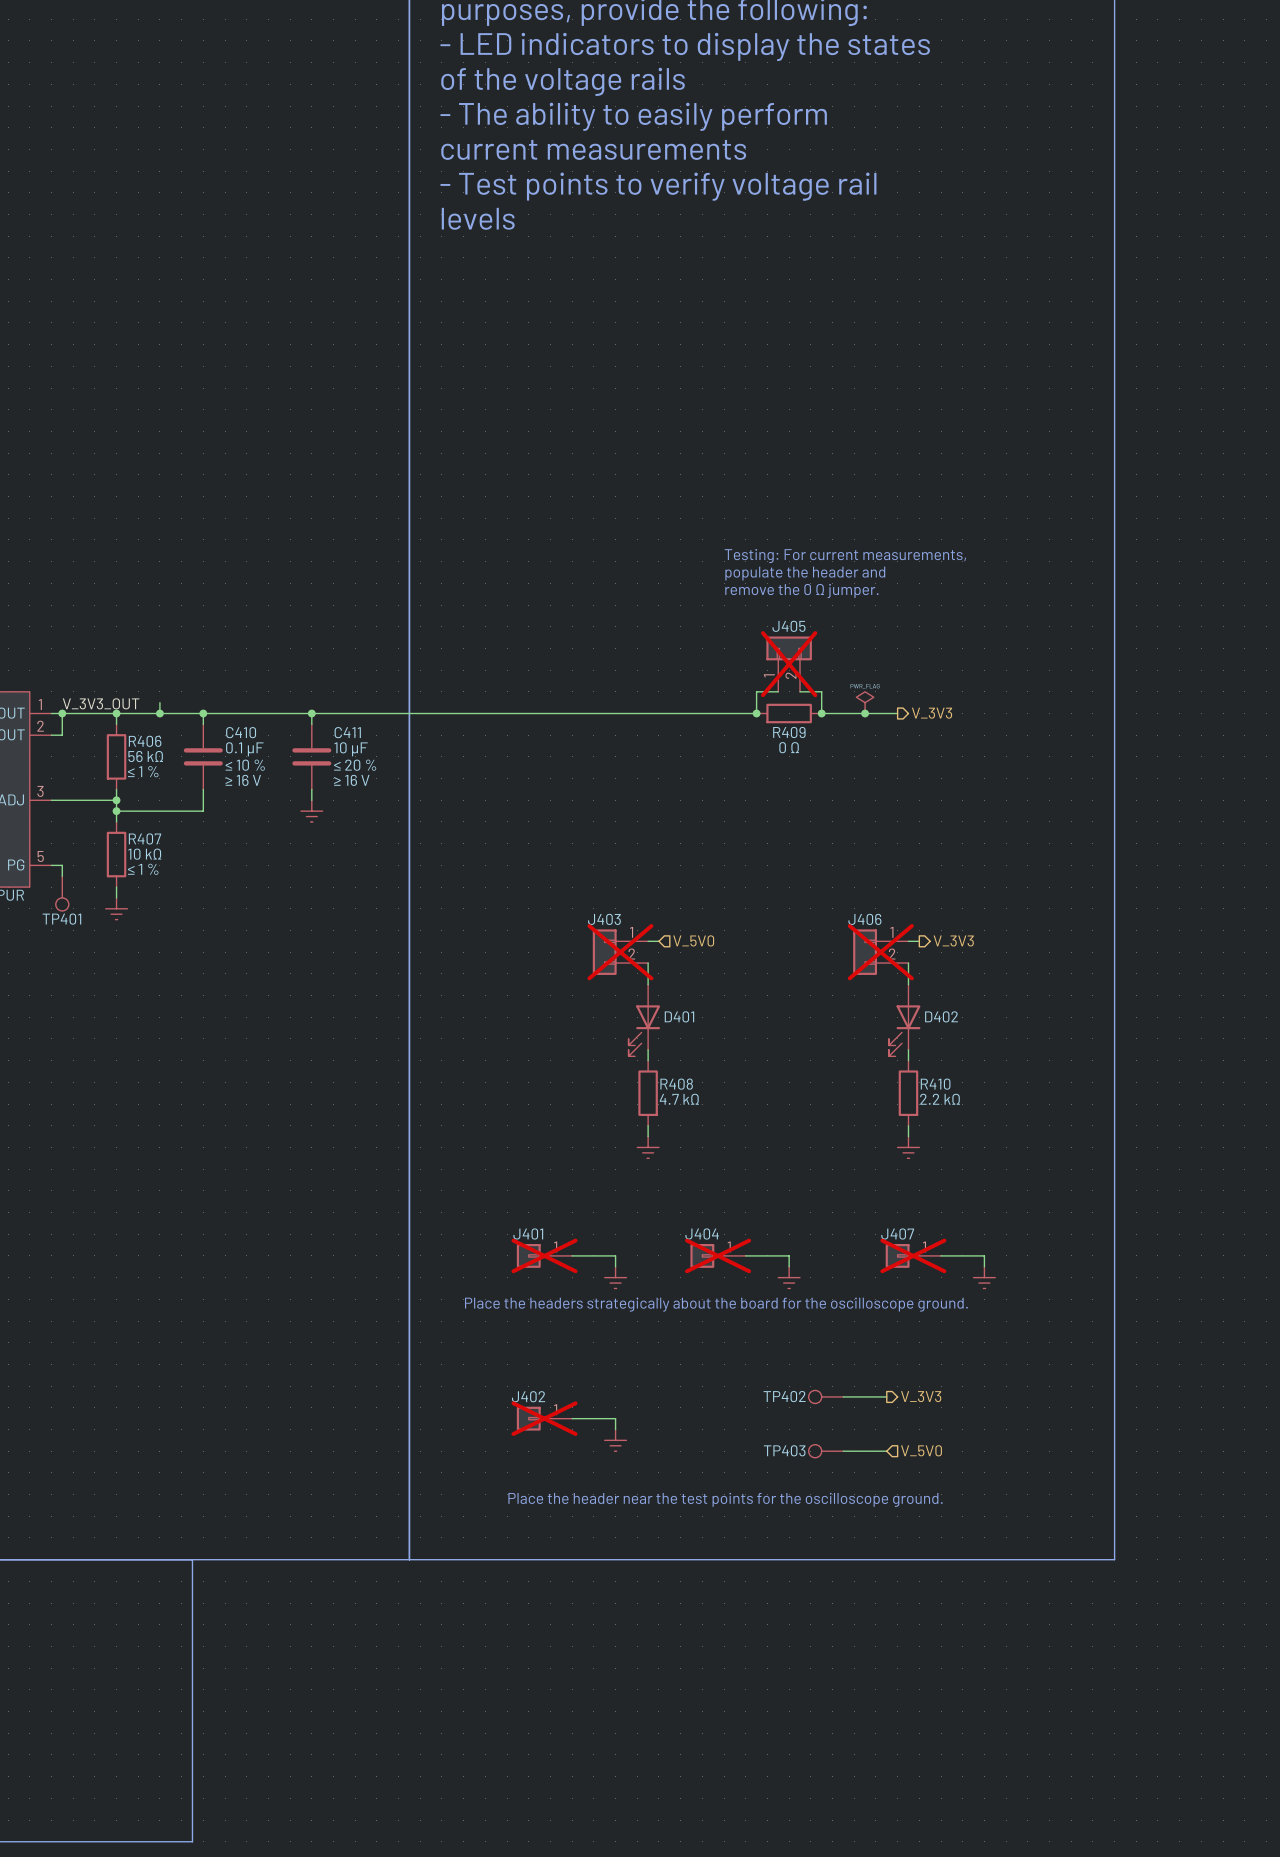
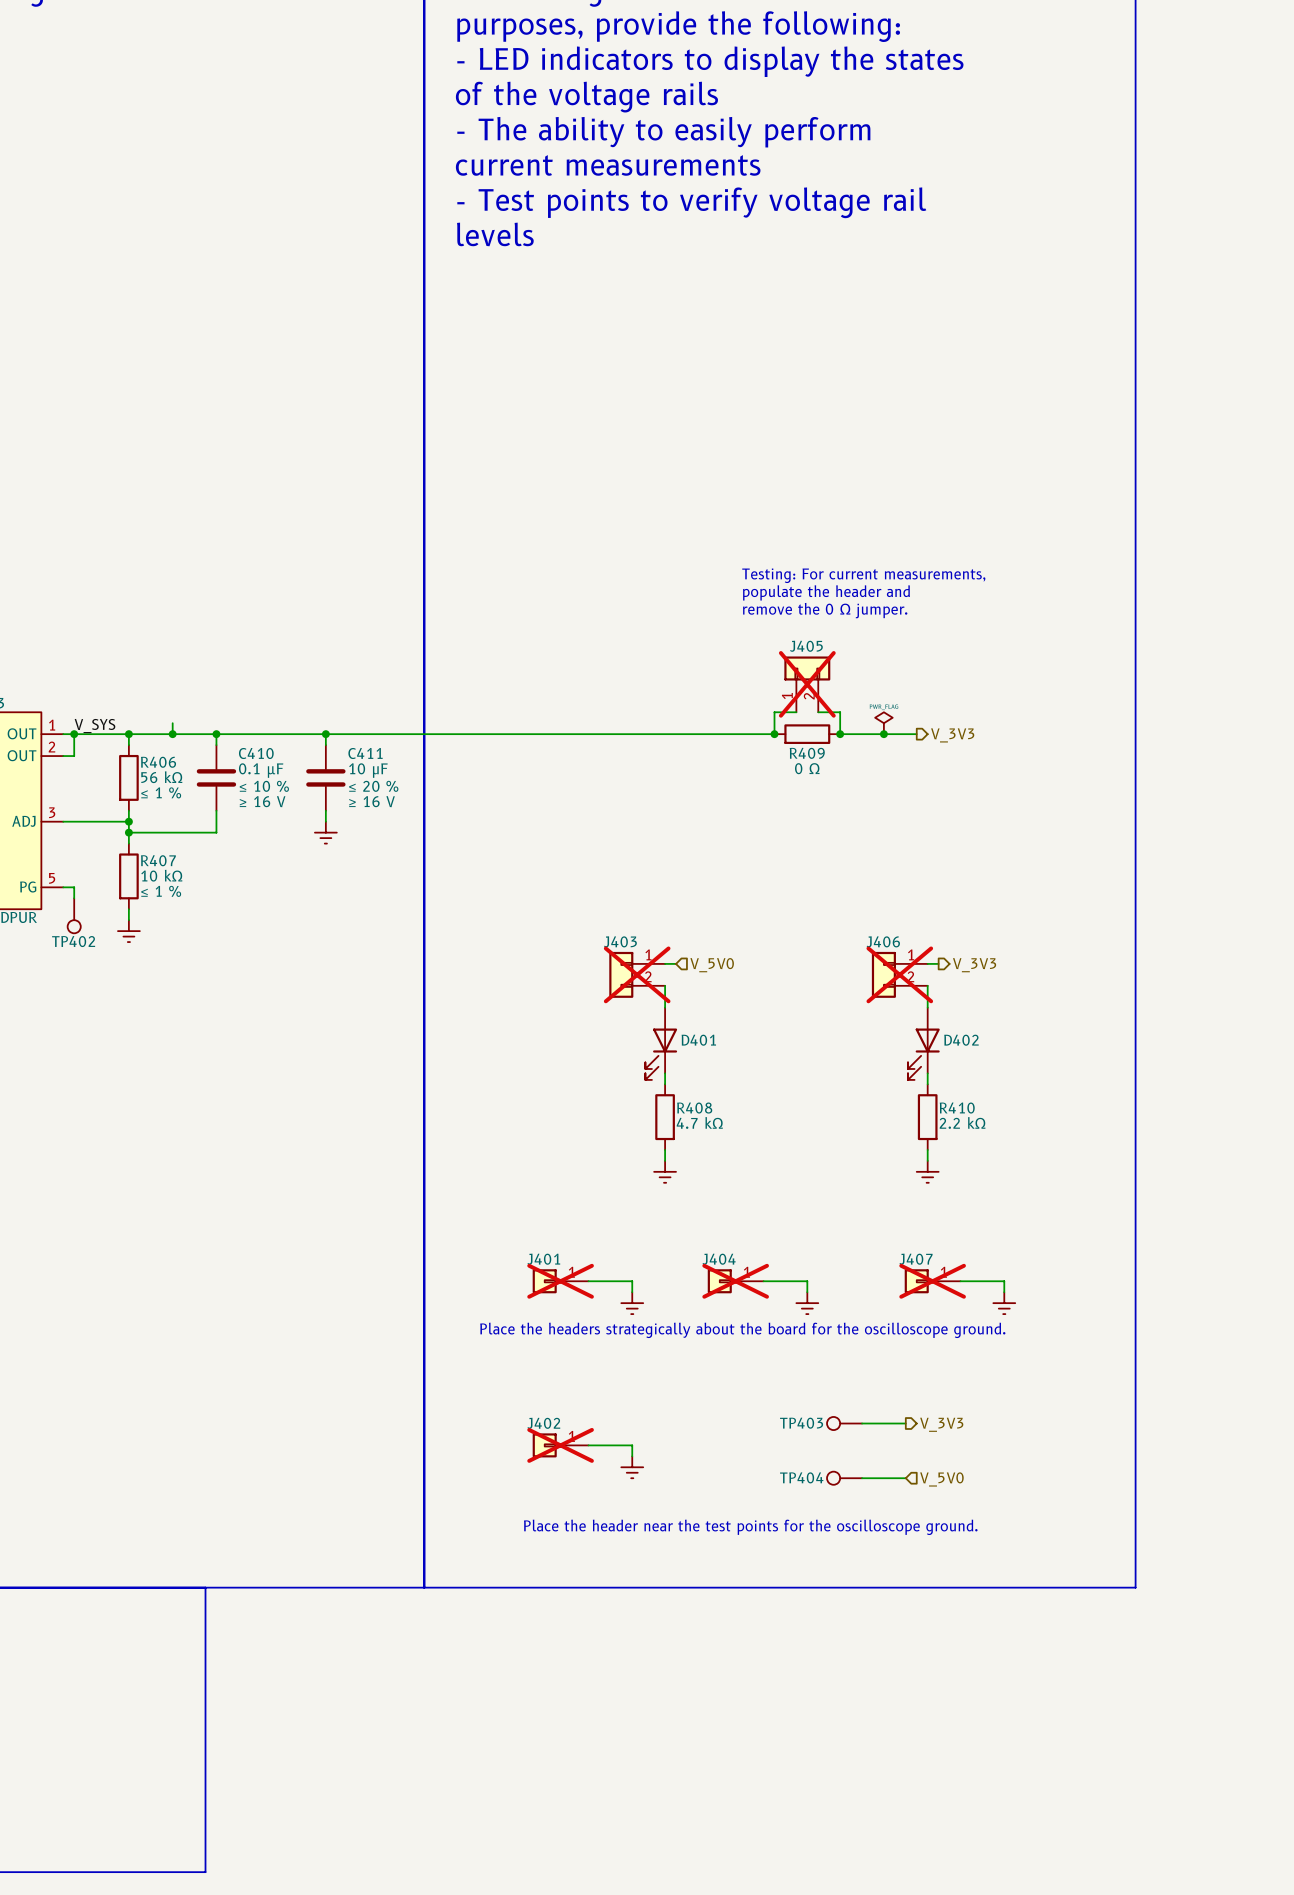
label: V_3V3_OUT (101, 703) -> V_SYS (94, 726)
TP401 name: TP401 (61, 919) -> TP402 (73, 941)
TP402 name: TP402 (784, 1396) -> TP403 (801, 1423)
TP403 name: TP403 (784, 1450) -> TP404 (801, 1477)

